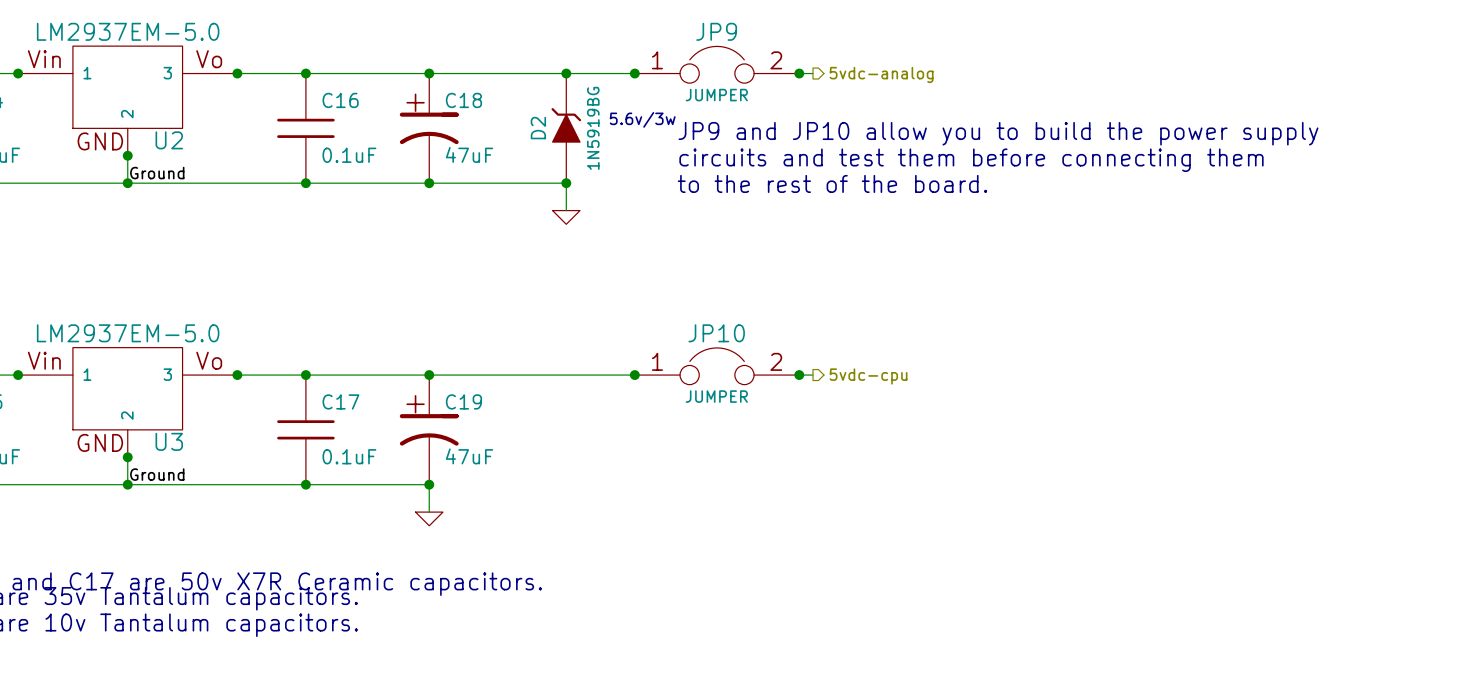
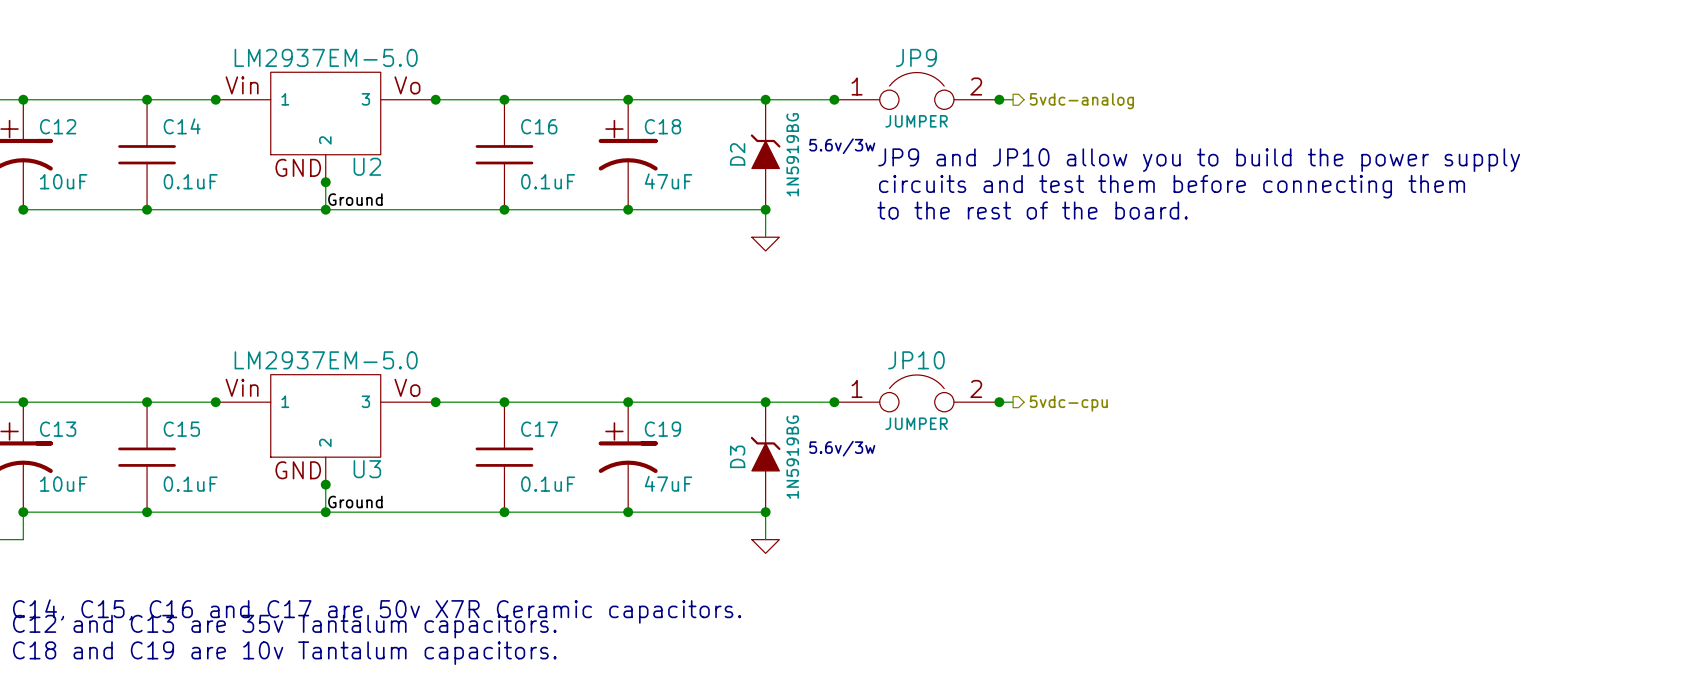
junction: none -> (765, 402)
text: none -> 5.6v/3w (842, 448)
D3: none -> 1N5919BG (765, 457)
wire: (429, 484) (429, 512) -> (628, 512) (765, 512) (765, 539)
junction: none -> (765, 512)
power symbol position: (429, 518) -> (765, 546)

